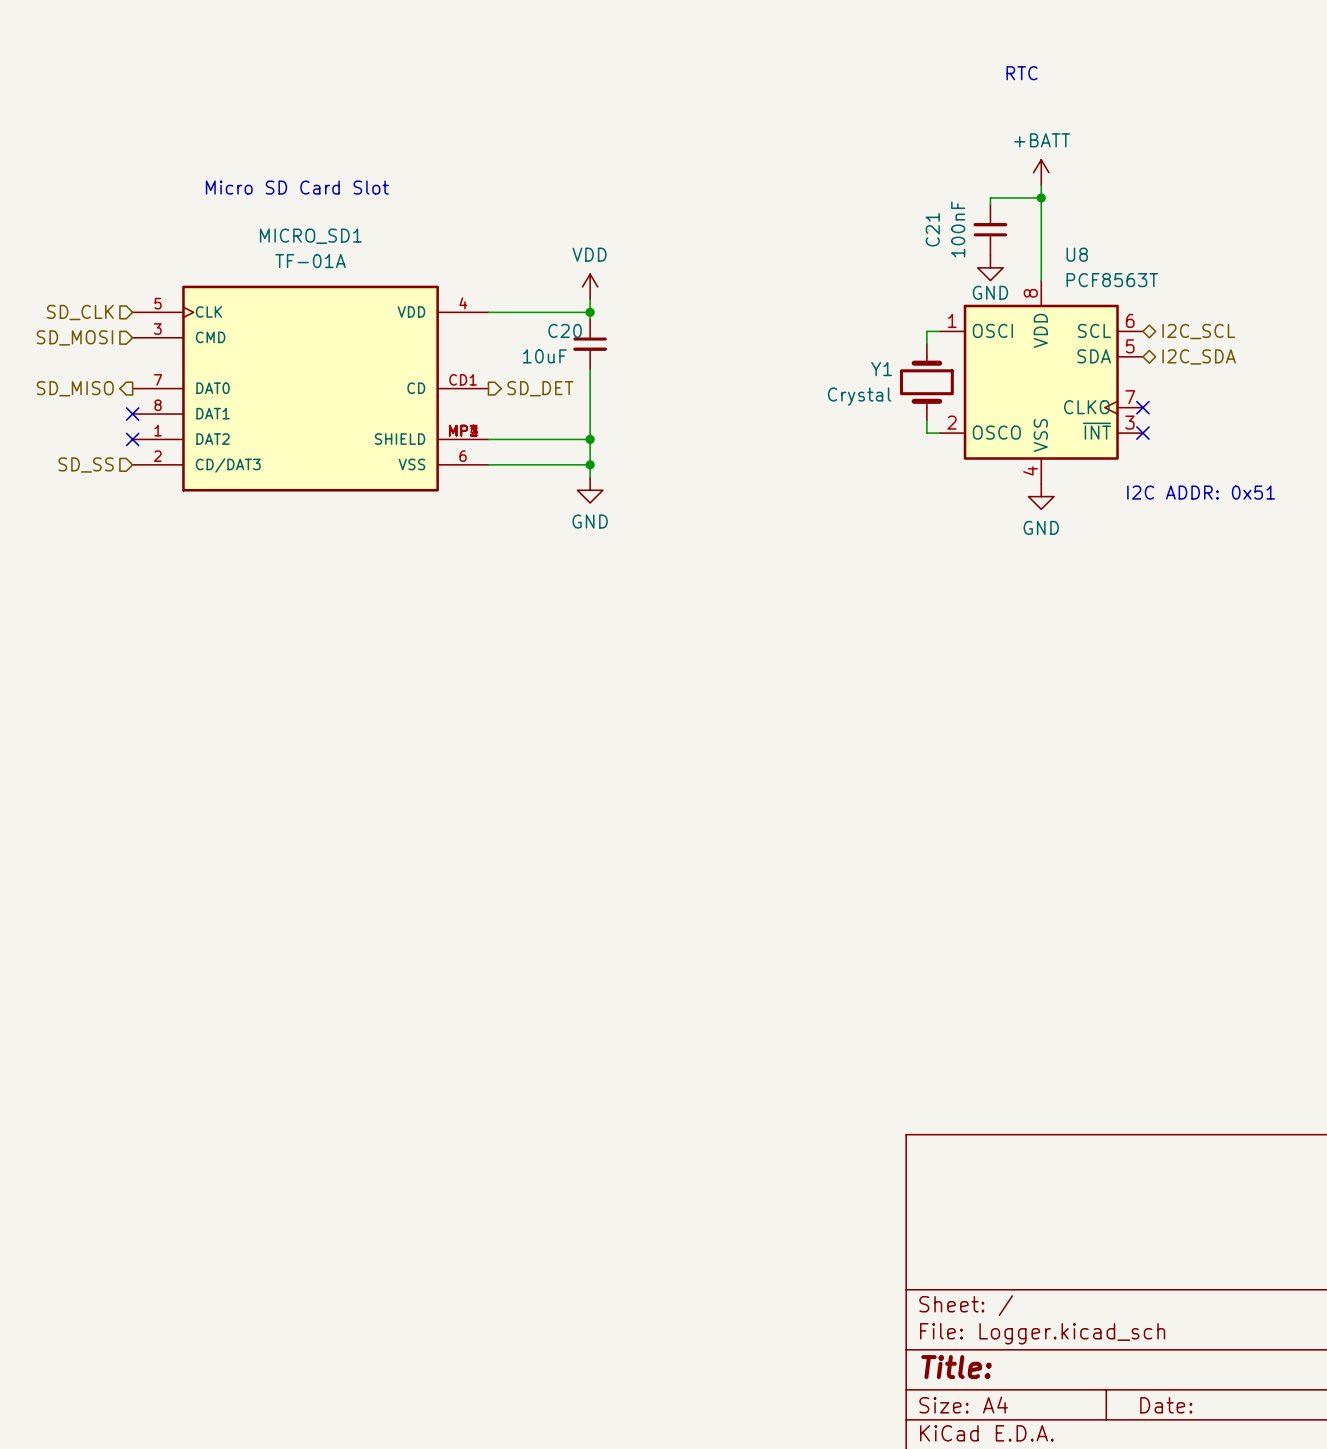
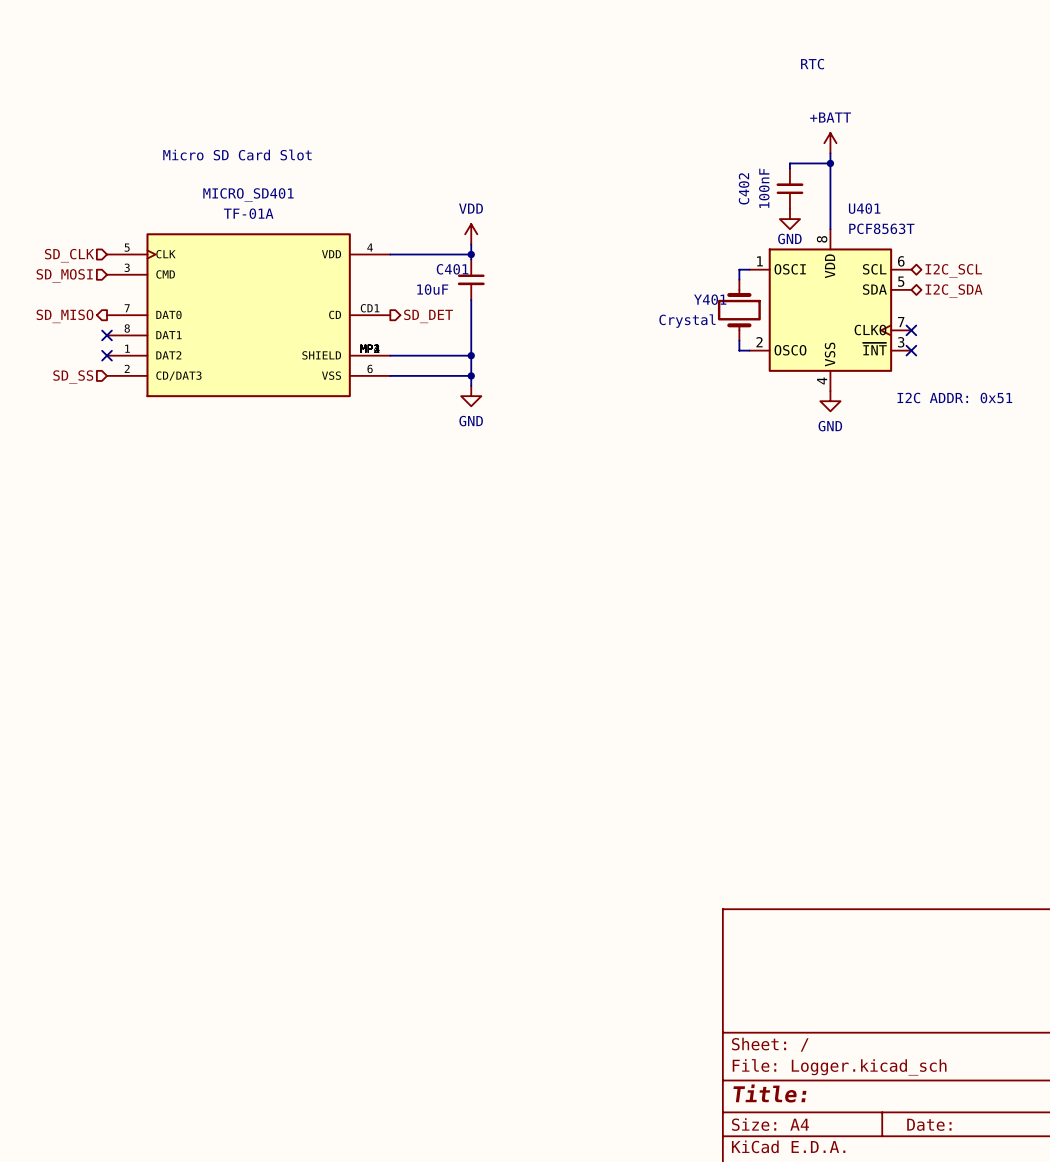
C21 name: C21 (932, 229) -> C402 (744, 188)
MICRO_SD1 name: MICRO_SD1 (310, 236) -> MICRO_SD401 (248, 194)
U8 name: U8 (1077, 254) -> U401 (864, 208)
C20 name: C20 (565, 330) -> C401 (452, 269)
Y1 name: Y1 (881, 369) -> Y401 (710, 299)

